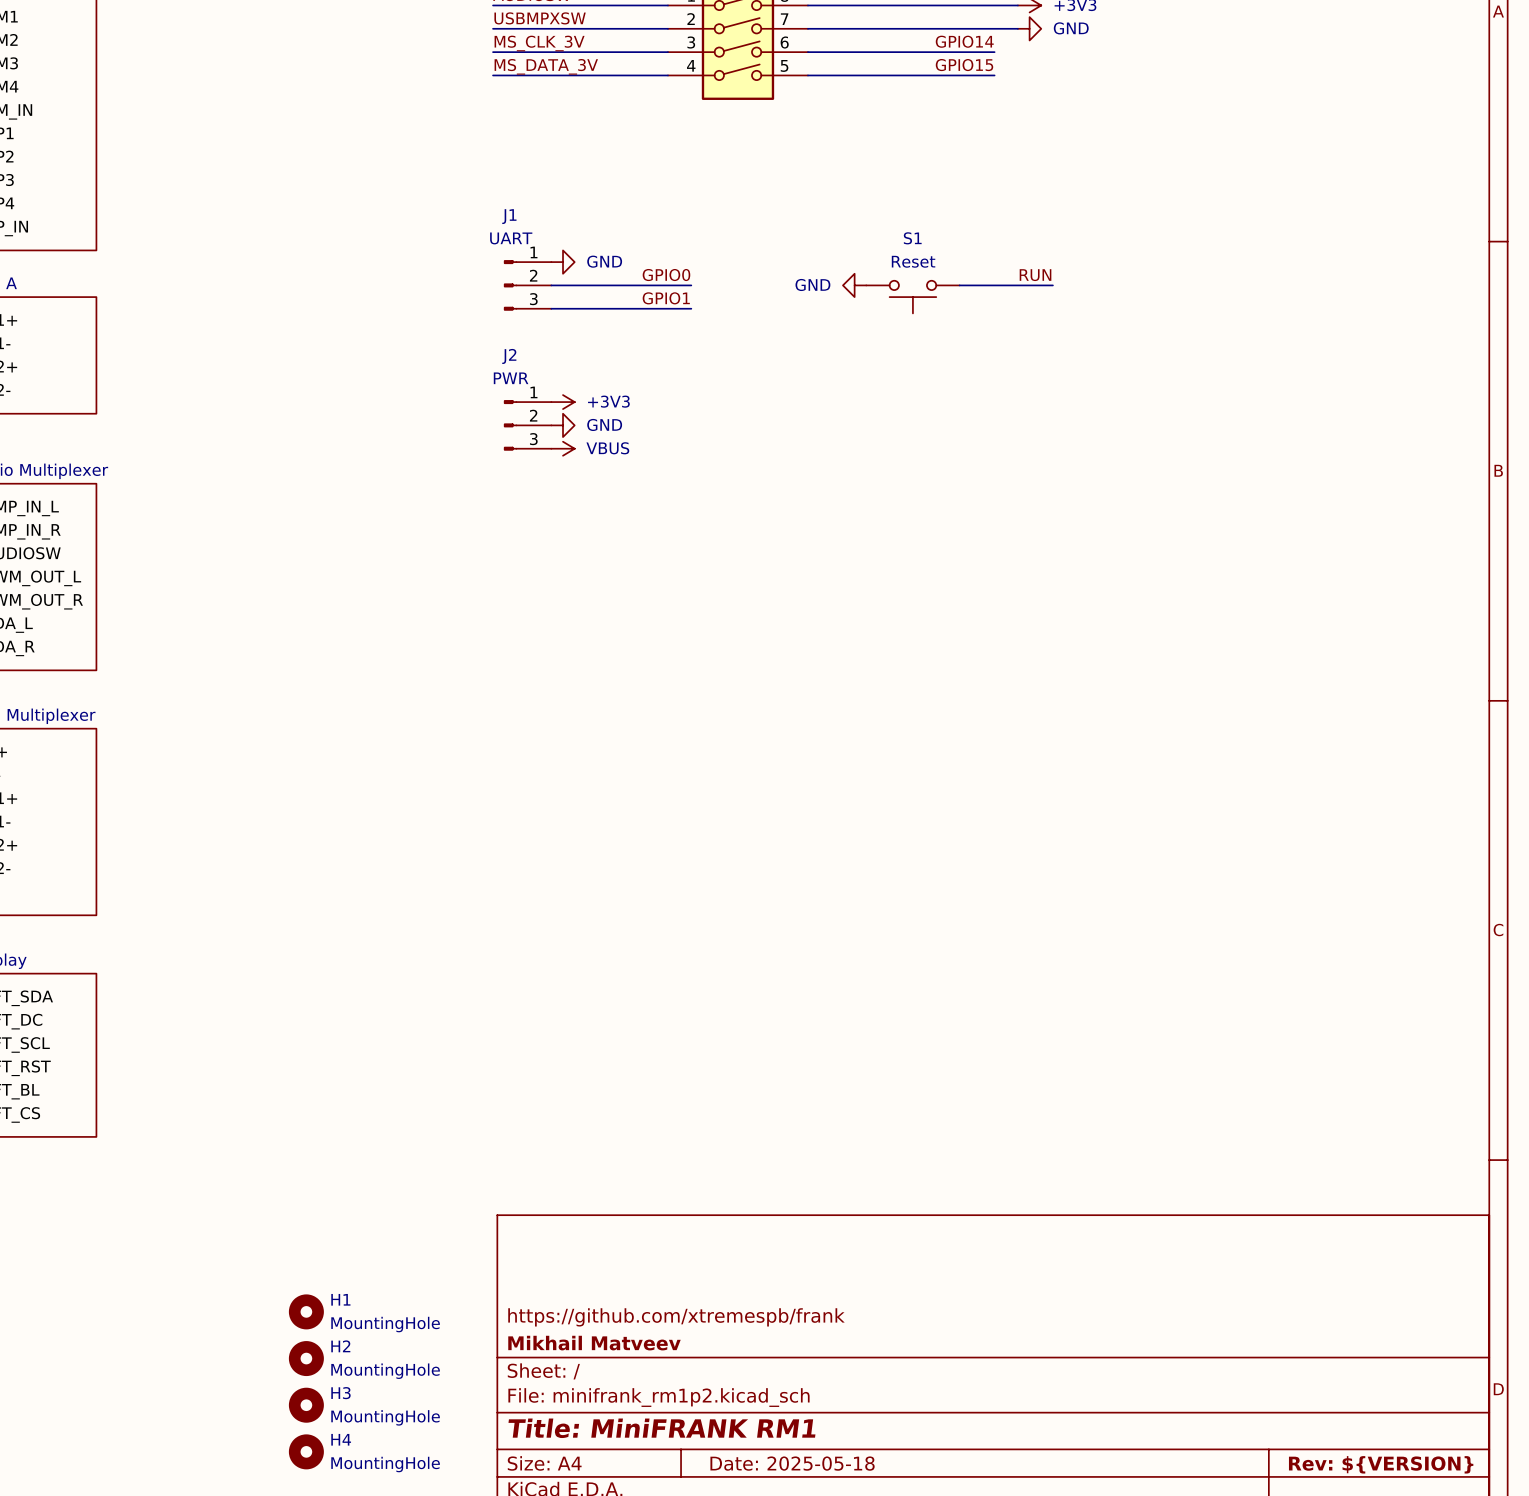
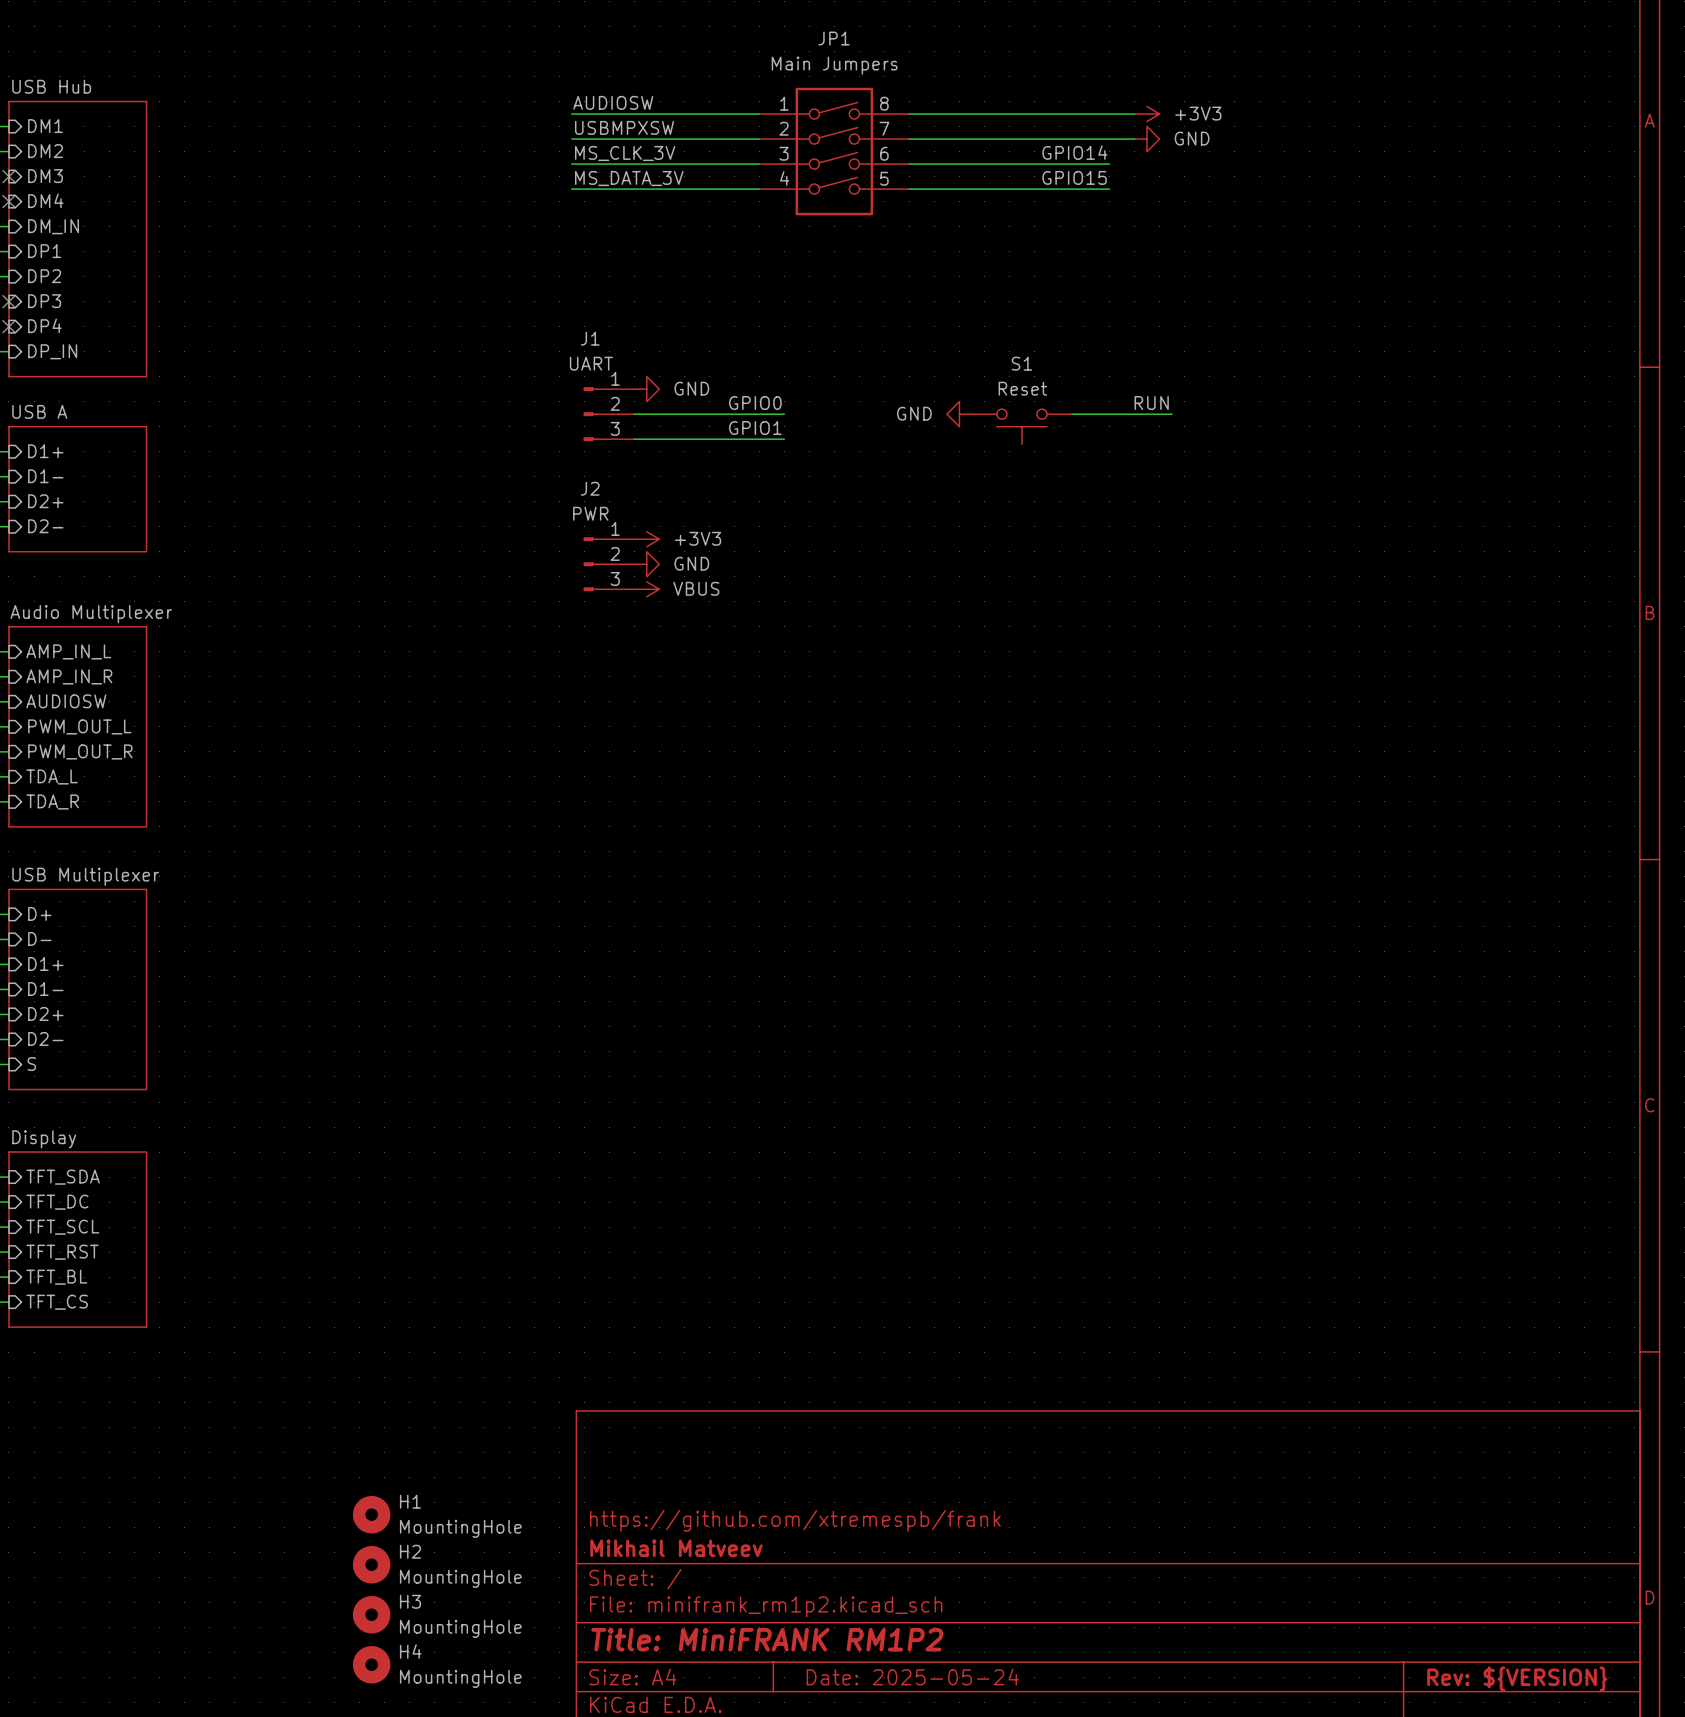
title block: Title: MiniFRANK RM1 (661, 1428) -> Title: MiniFRANK RM1P2 (767, 1639)
title block: Date: 2025-05-18 (792, 1463) -> Date: 2025-05-24 (912, 1676)

